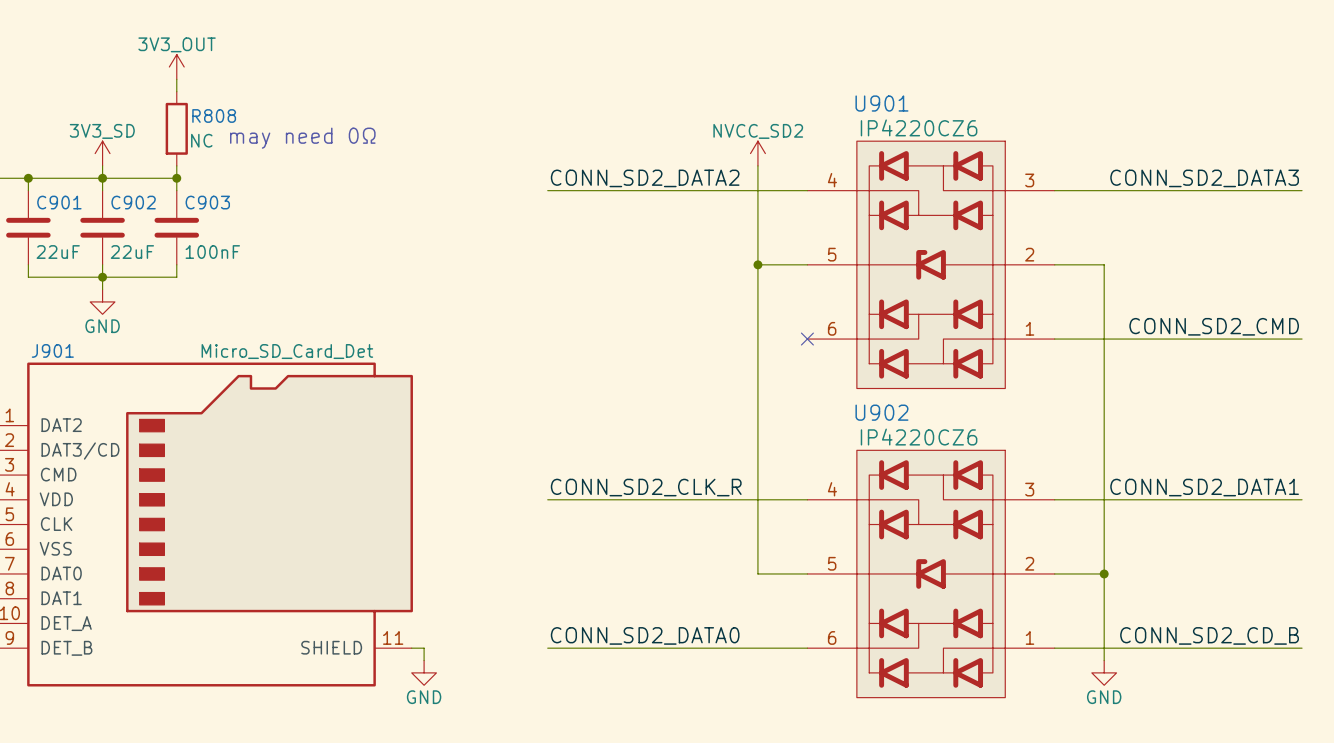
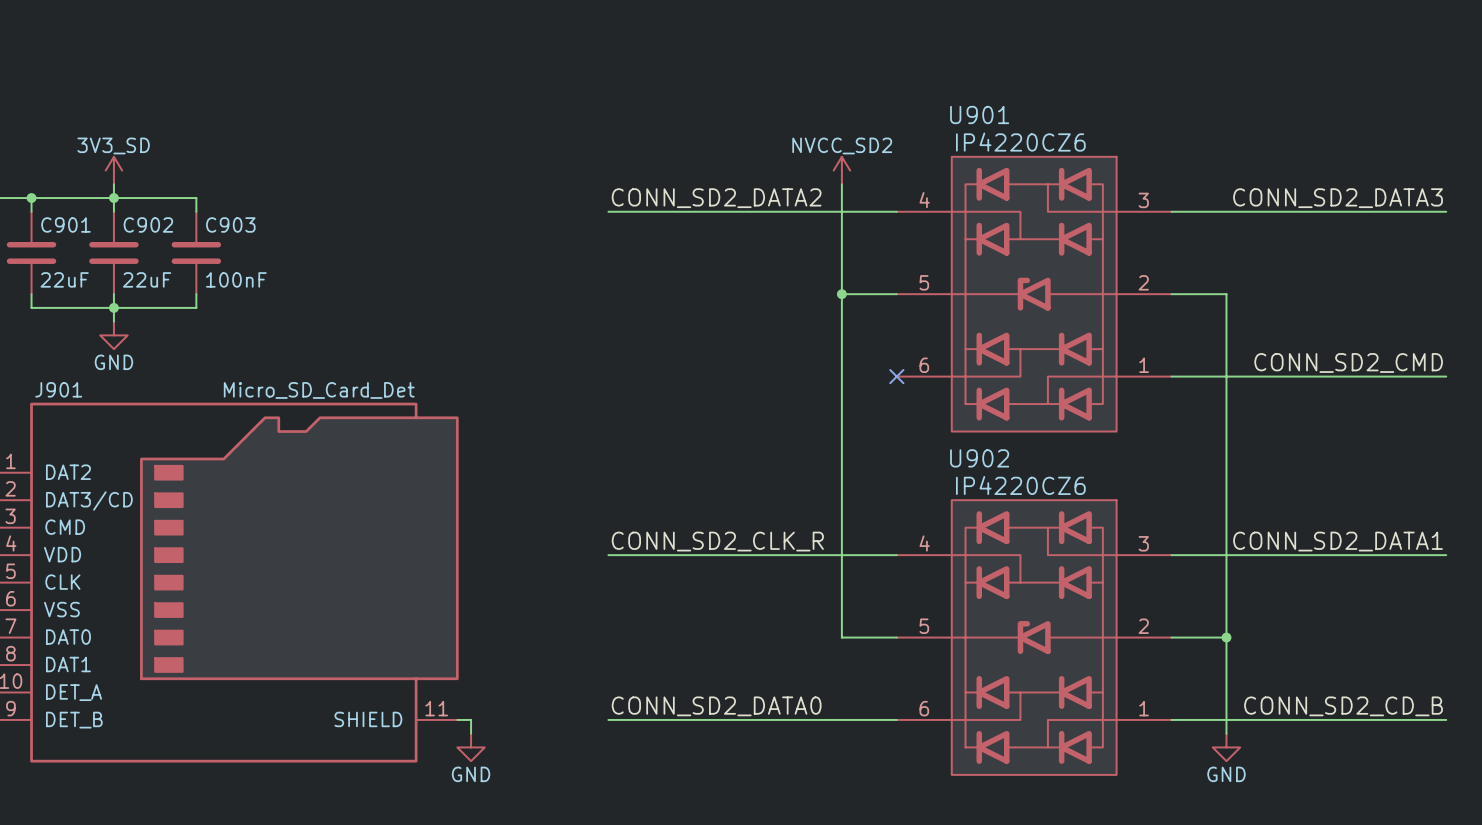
power symbol: 3V3_OUT (176, 66) -> none
wire: (176, 79) (176, 91) -> none
R808: NC (176, 128) -> none
text: may need 0Ω (302, 138) -> none
wire: (176, 165) (176, 178) -> none
junction: (176, 178) -> none

